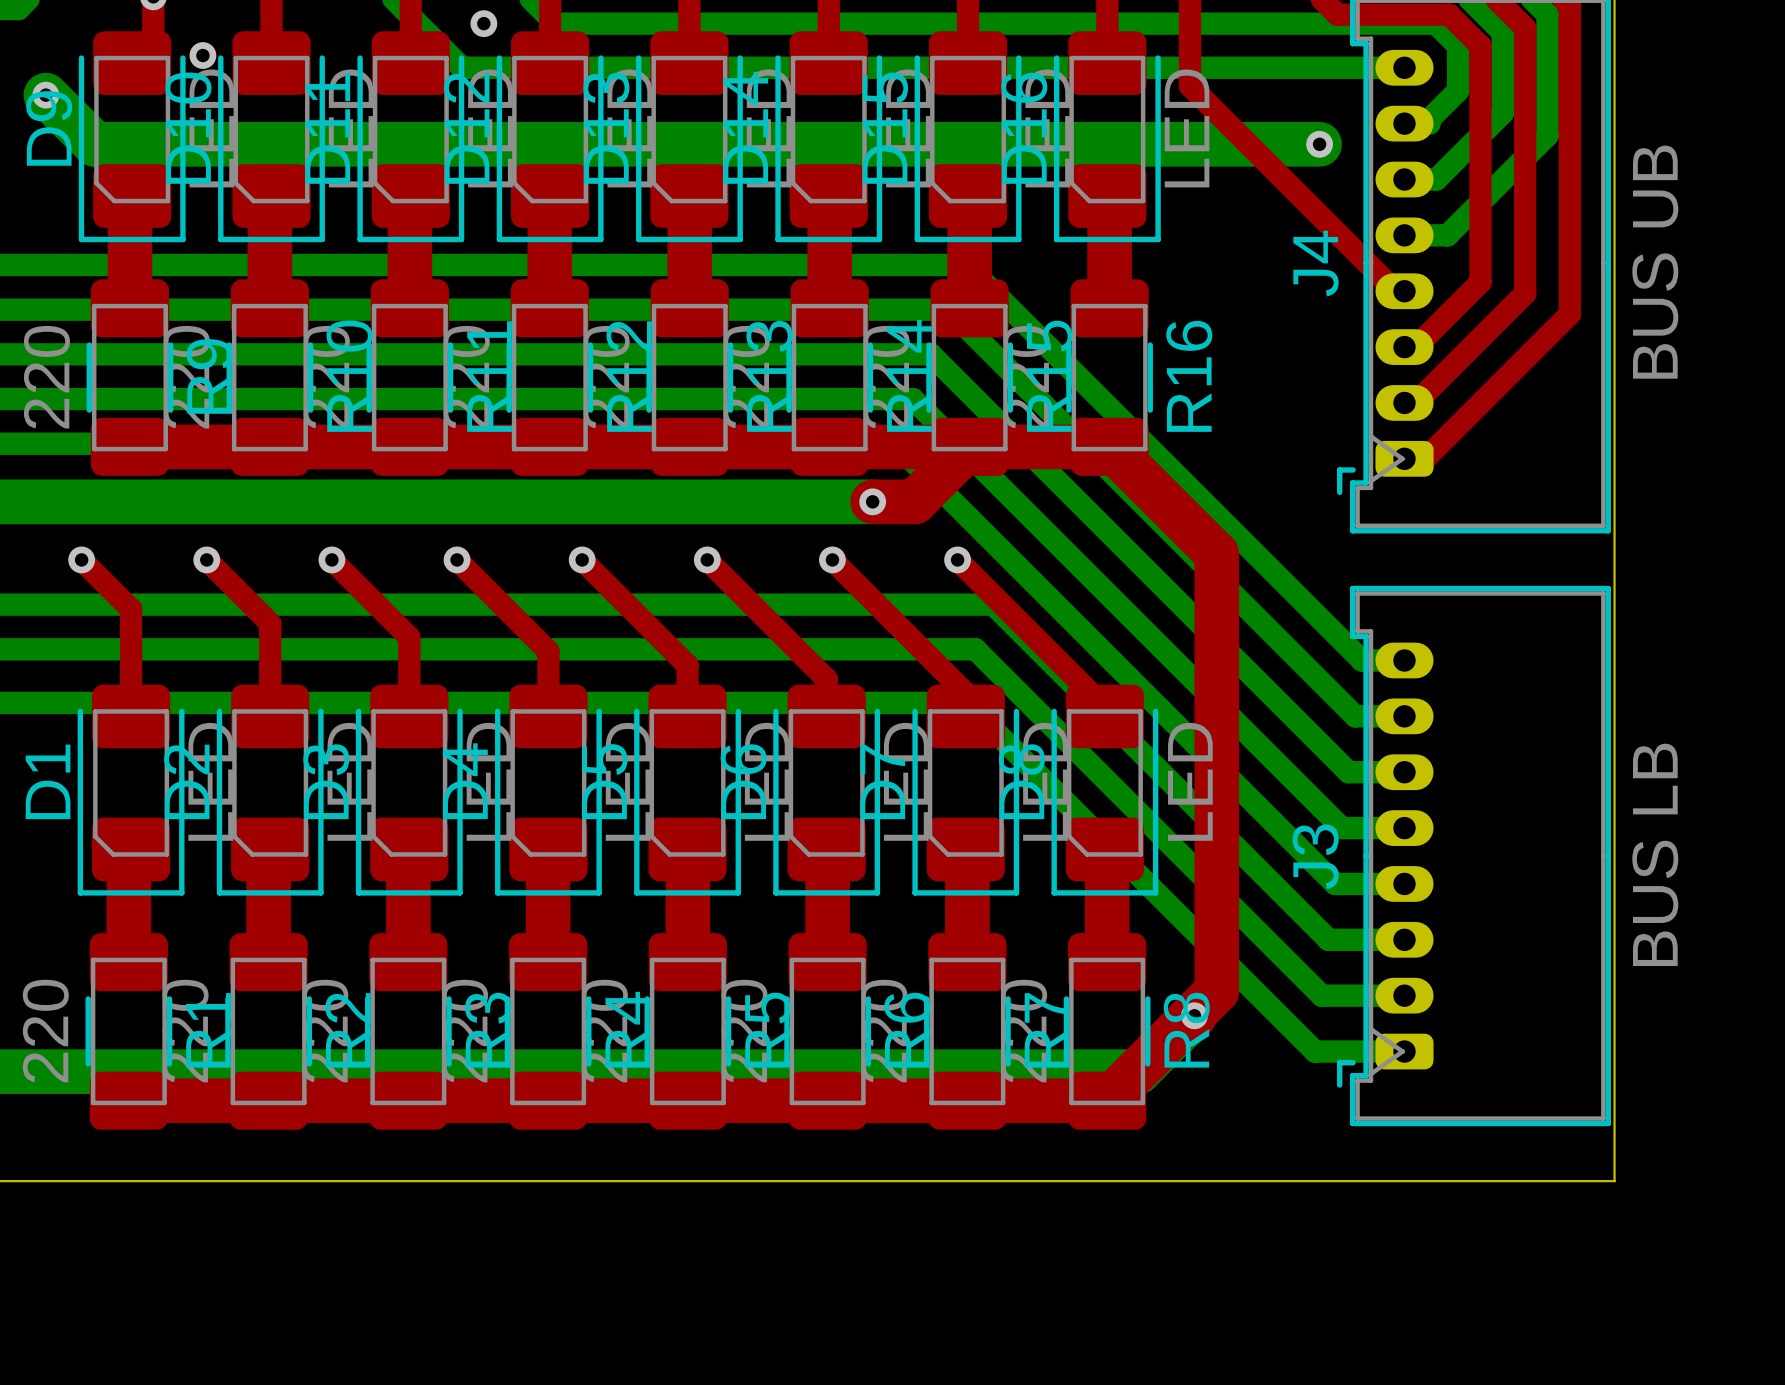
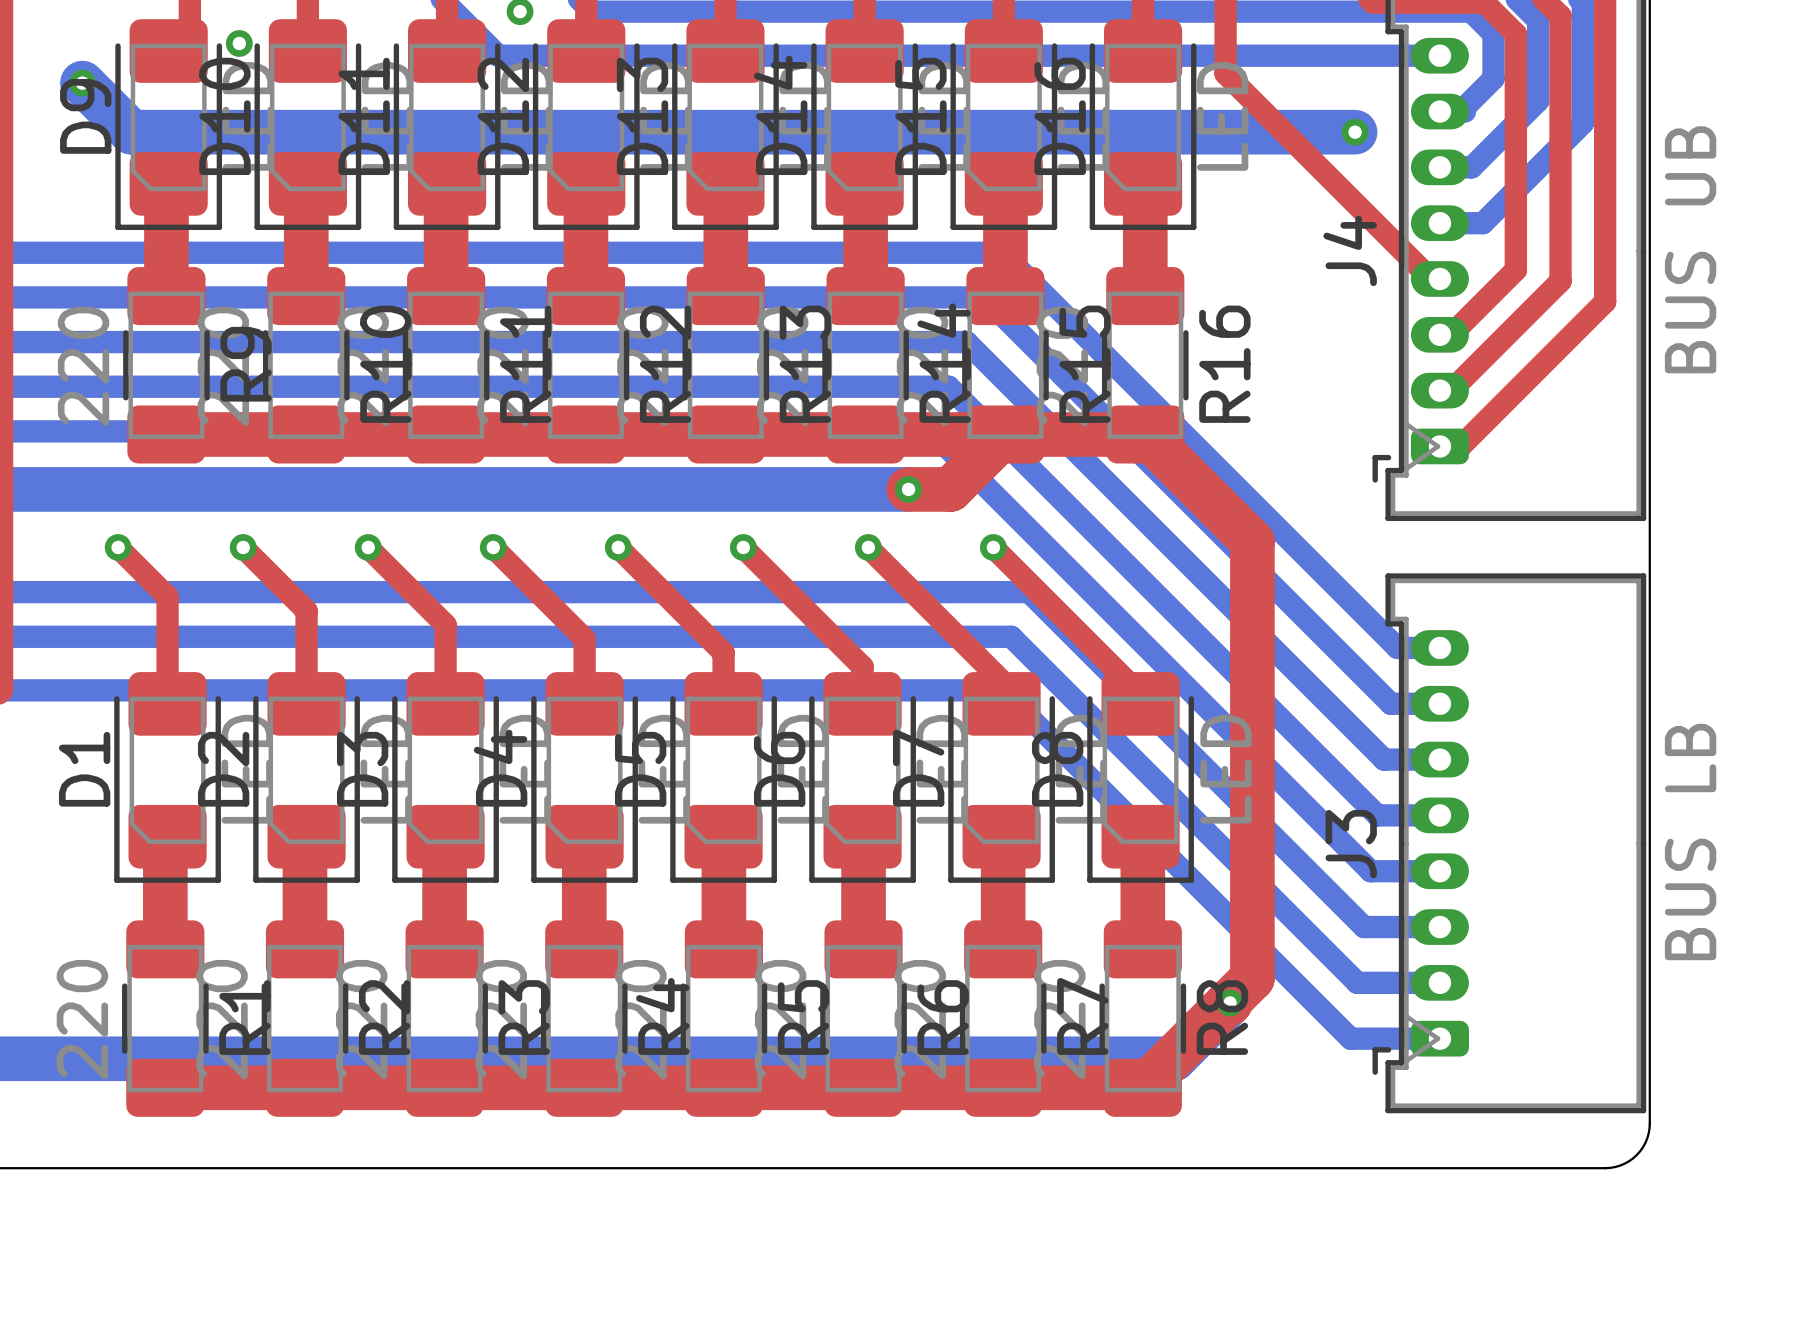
board edge: (1614, 1136) (1614, 1181) (1569, 1181) -> (1649, 1123) (1647, 1138) (1636, 1155) (1624, 1163) (1605, 1168)

